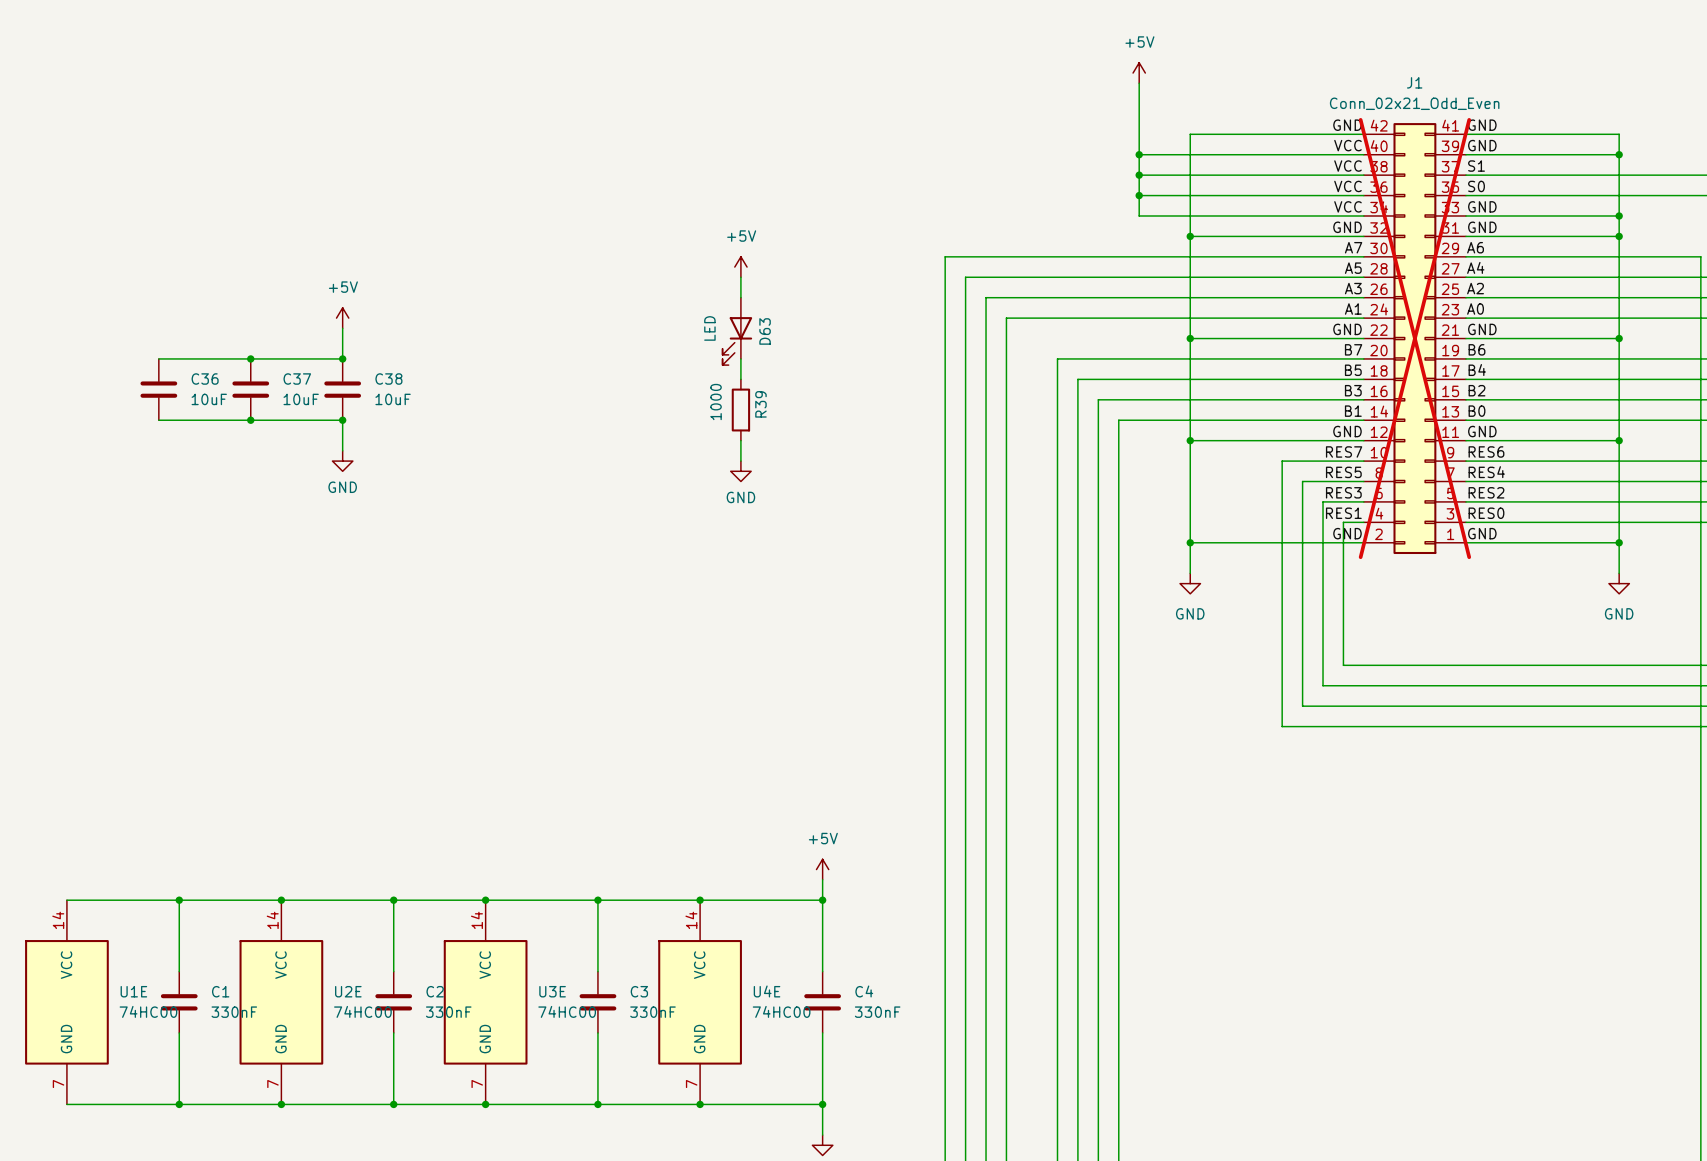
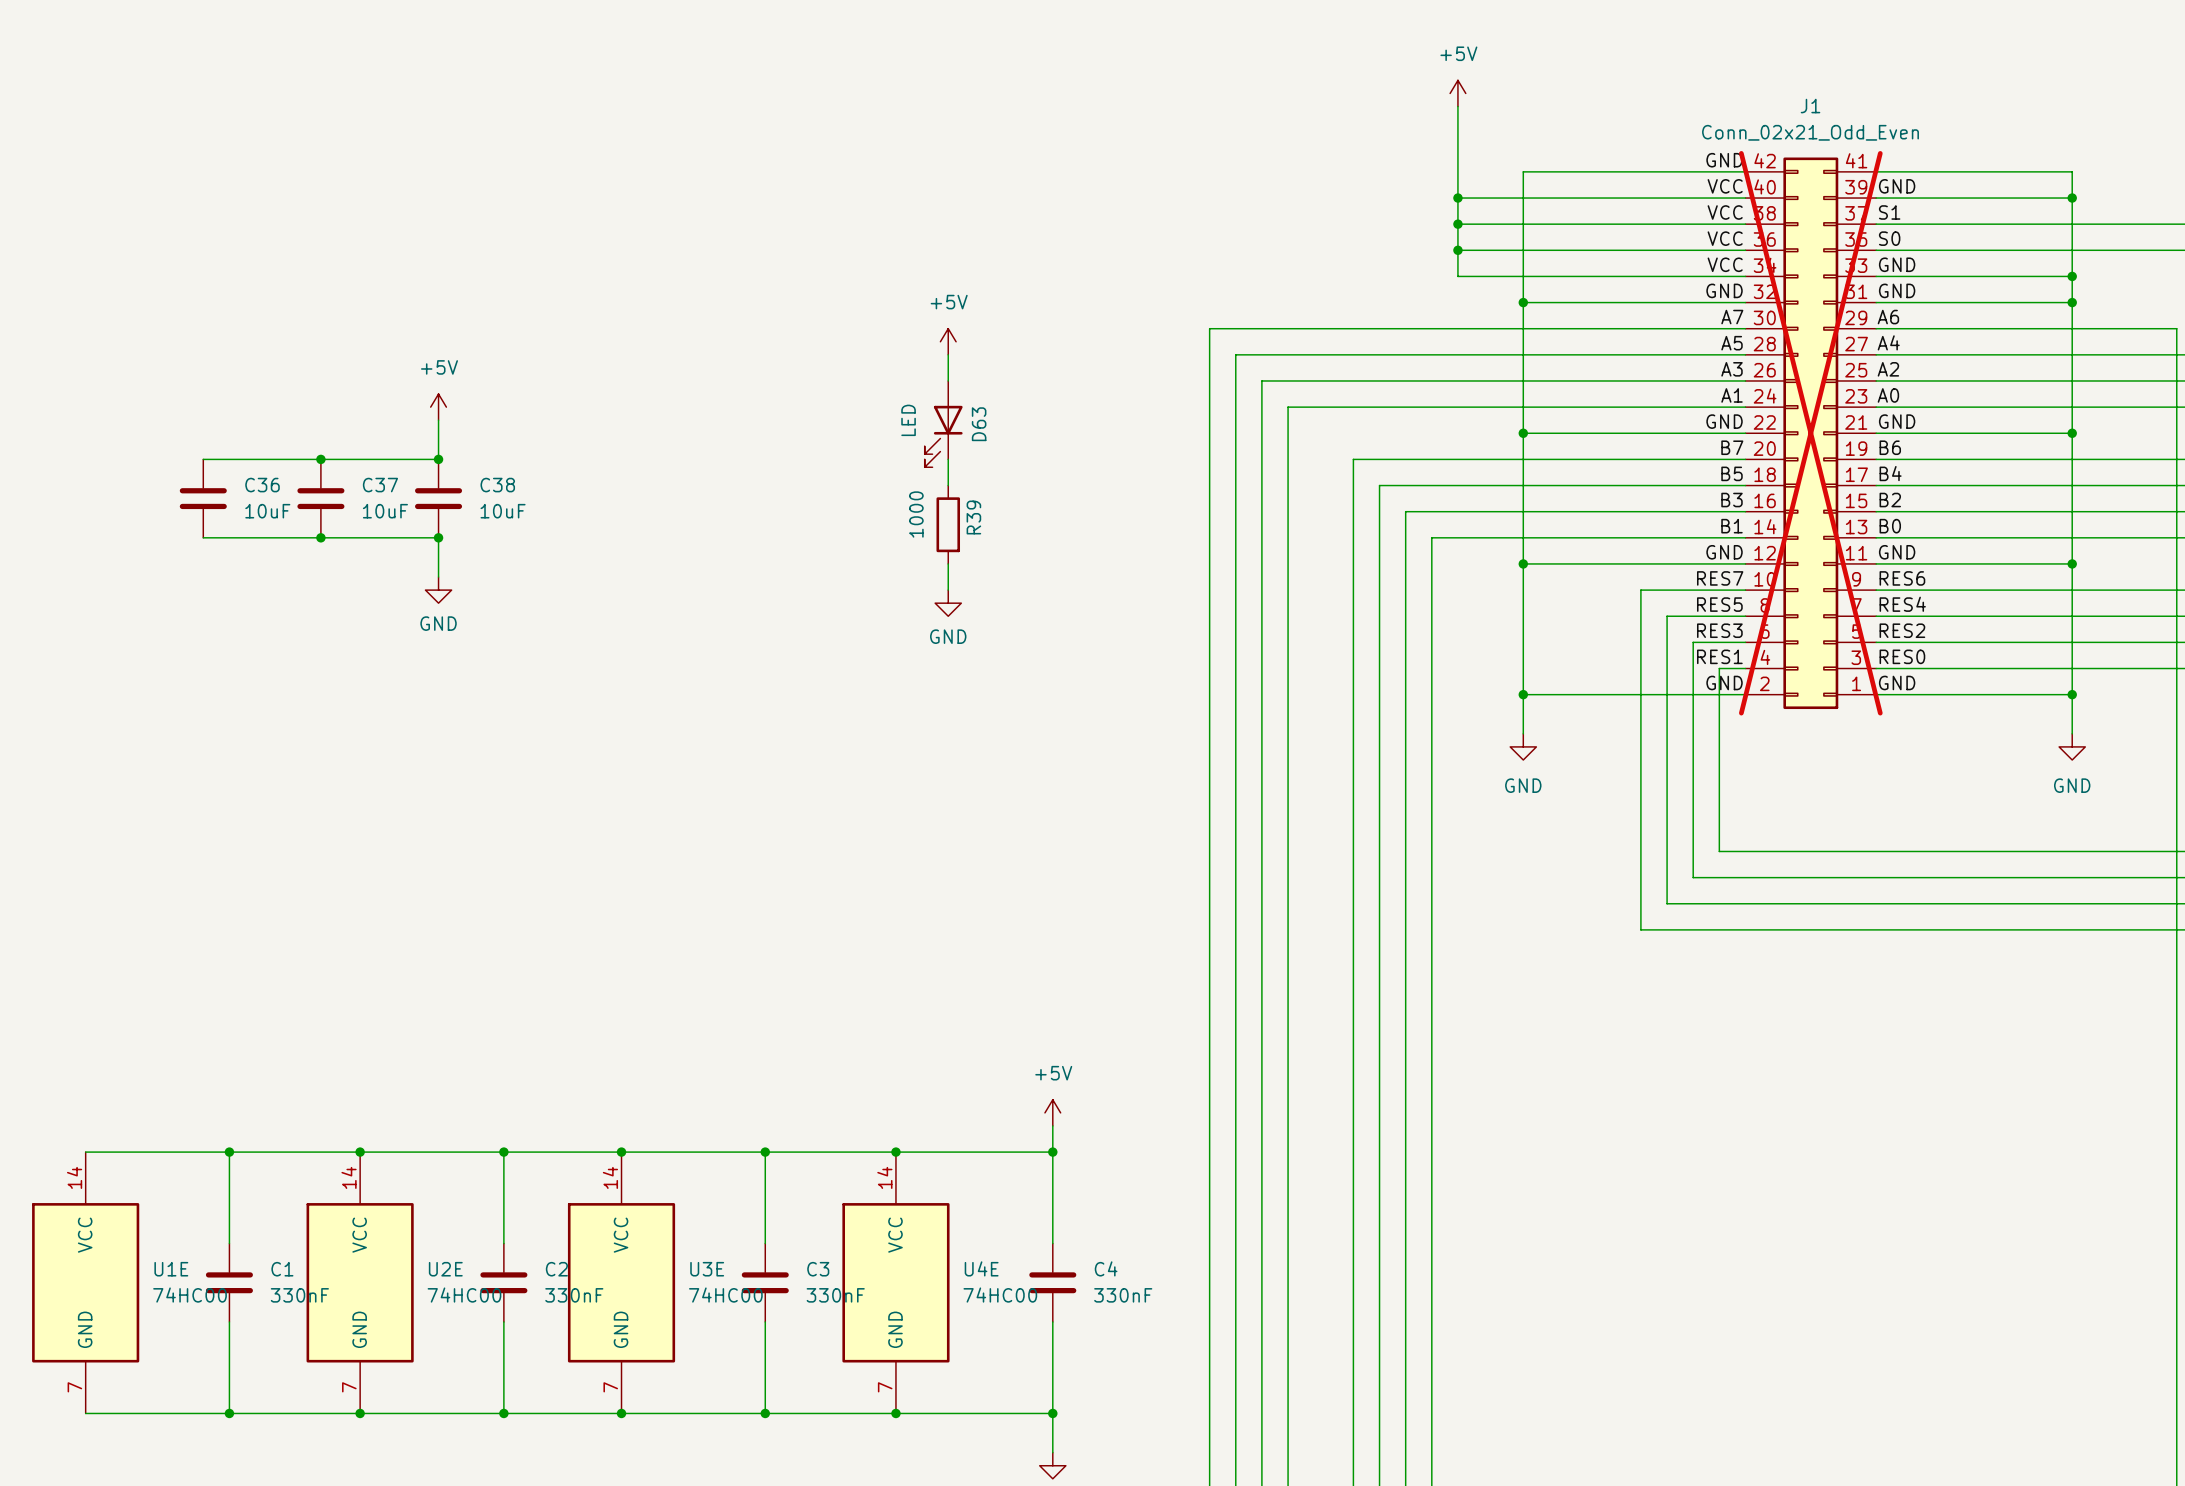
label: GND (1482, 125) -> none

